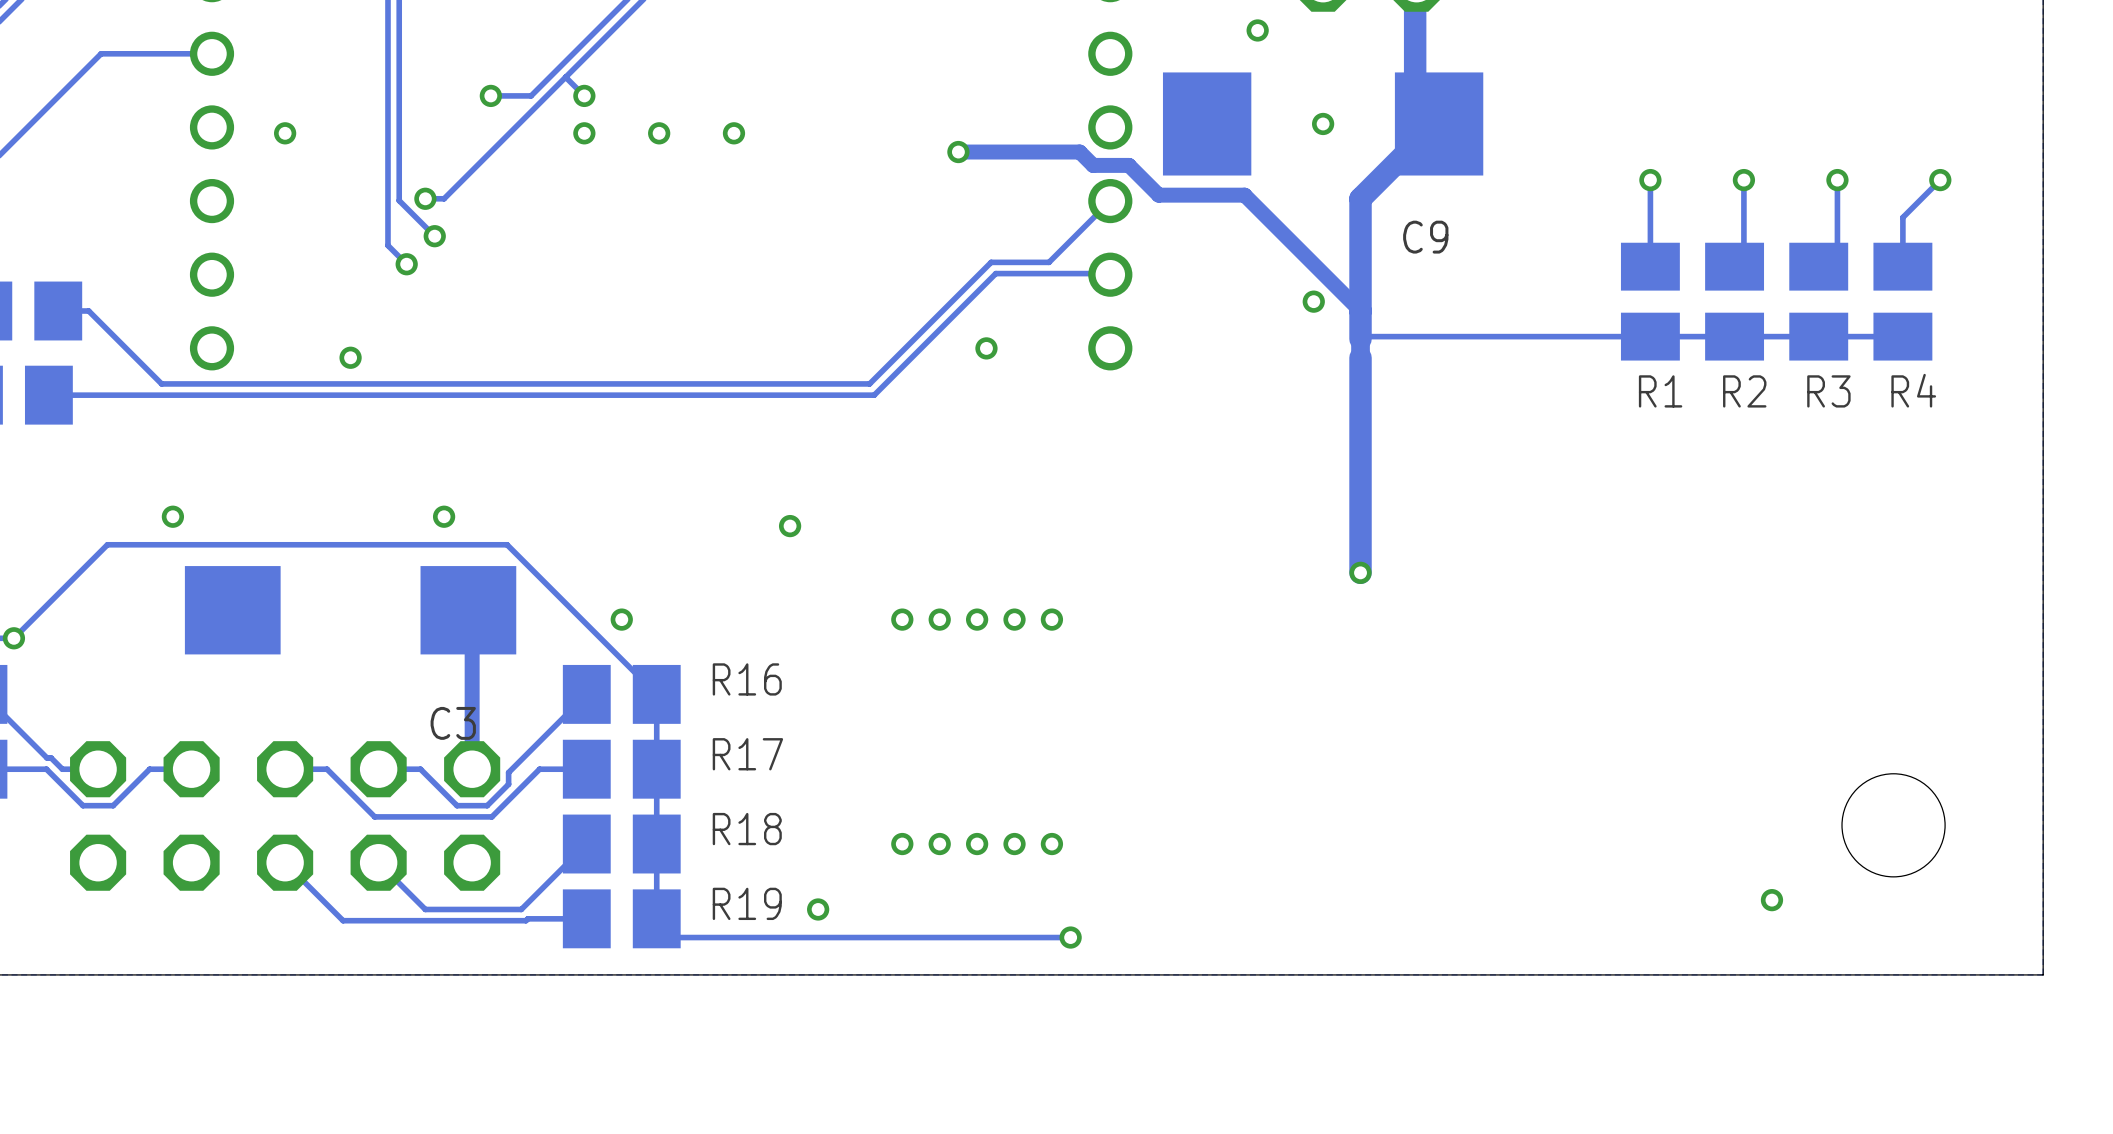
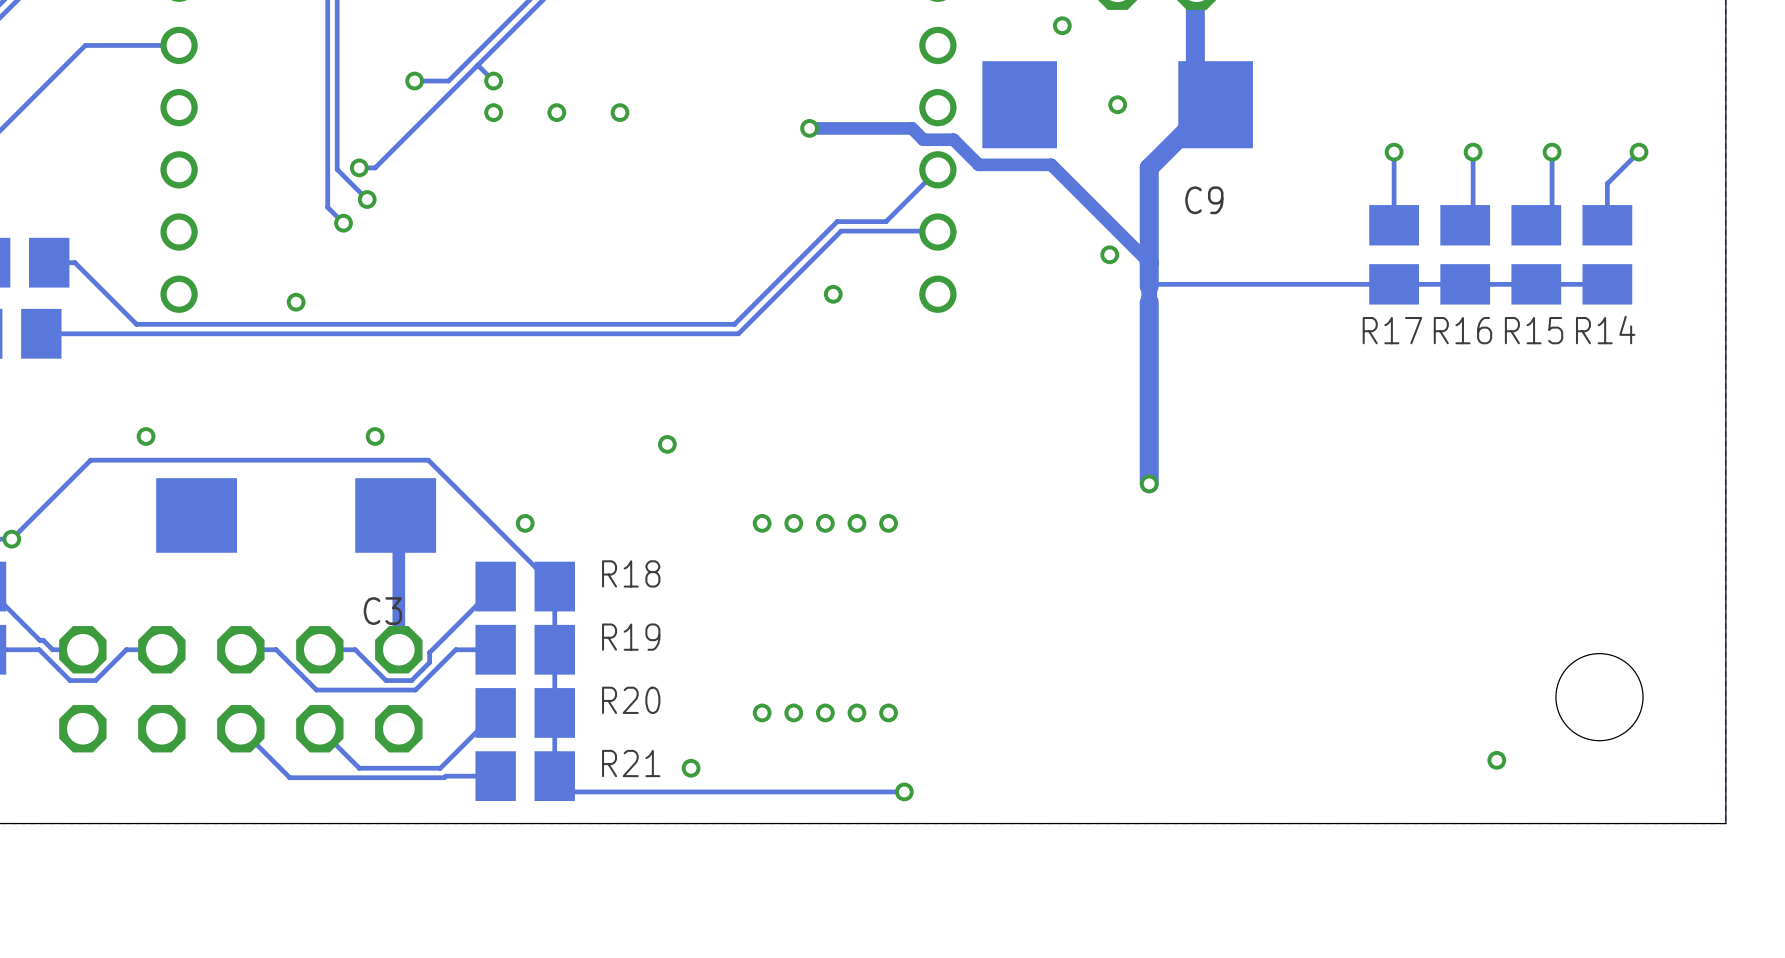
via: (285, 133) -> none
R4 name: R4 (1913, 390) -> R14 (1605, 330)
R1 name: R1 (1660, 391) -> R17 (1392, 330)
R2 name: R2 (1744, 391) -> R16 (1462, 330)
R3 name: R3 (1828, 391) -> R15 (1534, 330)
R16 name: R16 (747, 679) -> R18 (631, 573)
R17 name: R17 (747, 754) -> R19 (631, 637)
R18 name: R18 (747, 829) -> R20 (631, 700)
R19 name: R19 (747, 903) -> R21 (631, 763)

